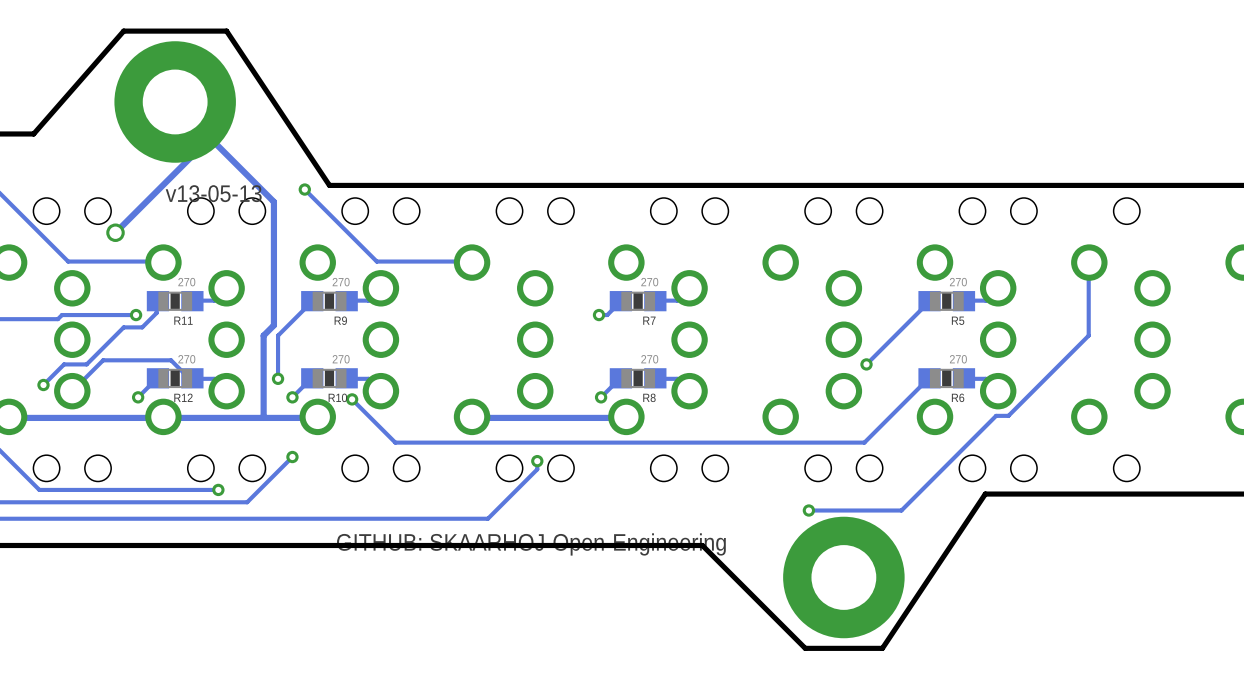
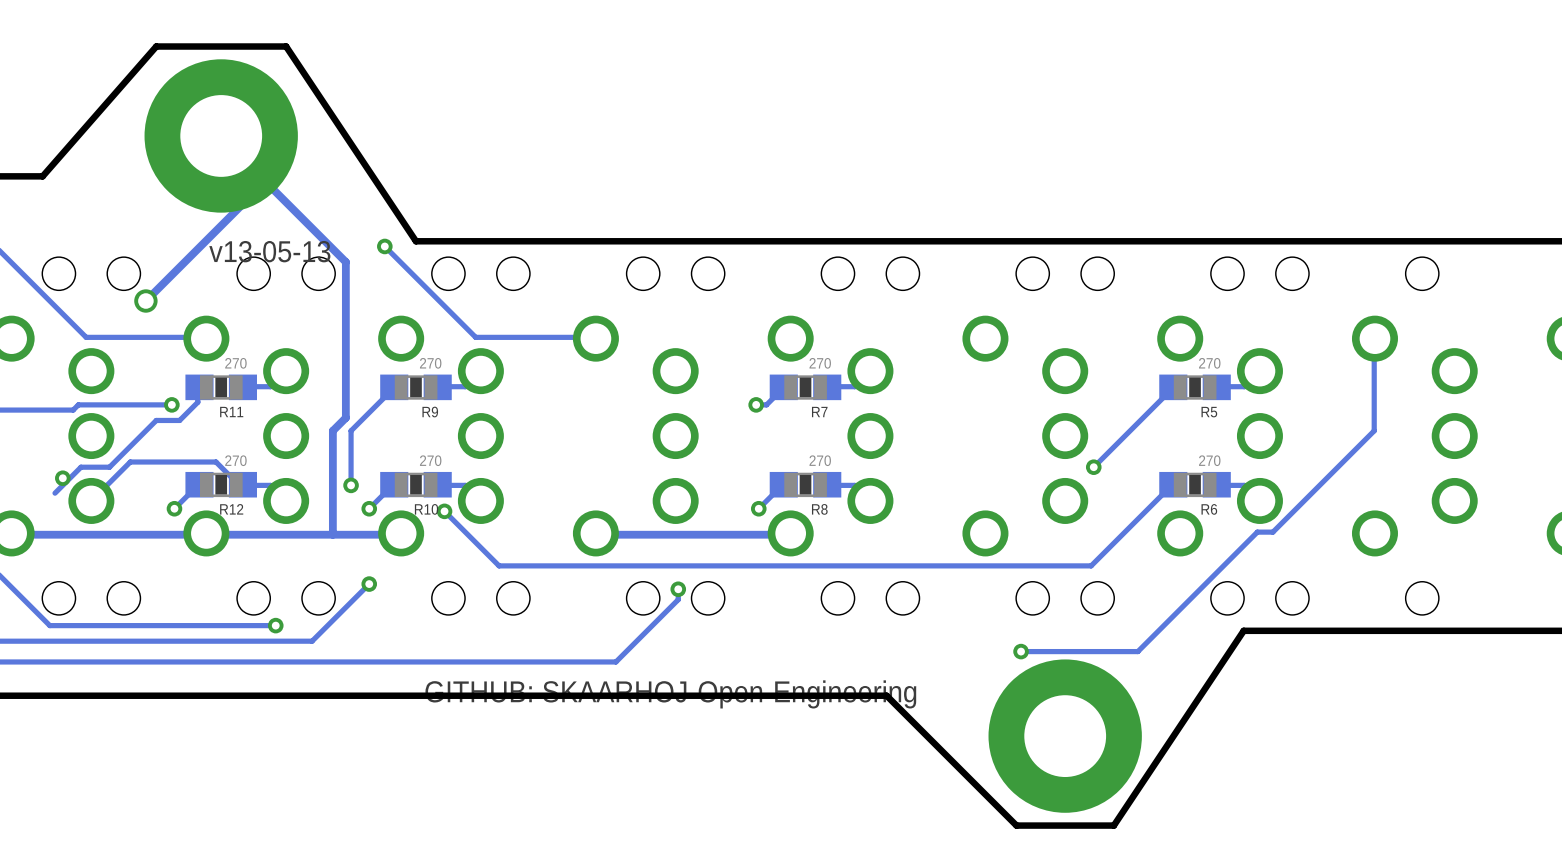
via position: (43, 385) -> (62, 478)

